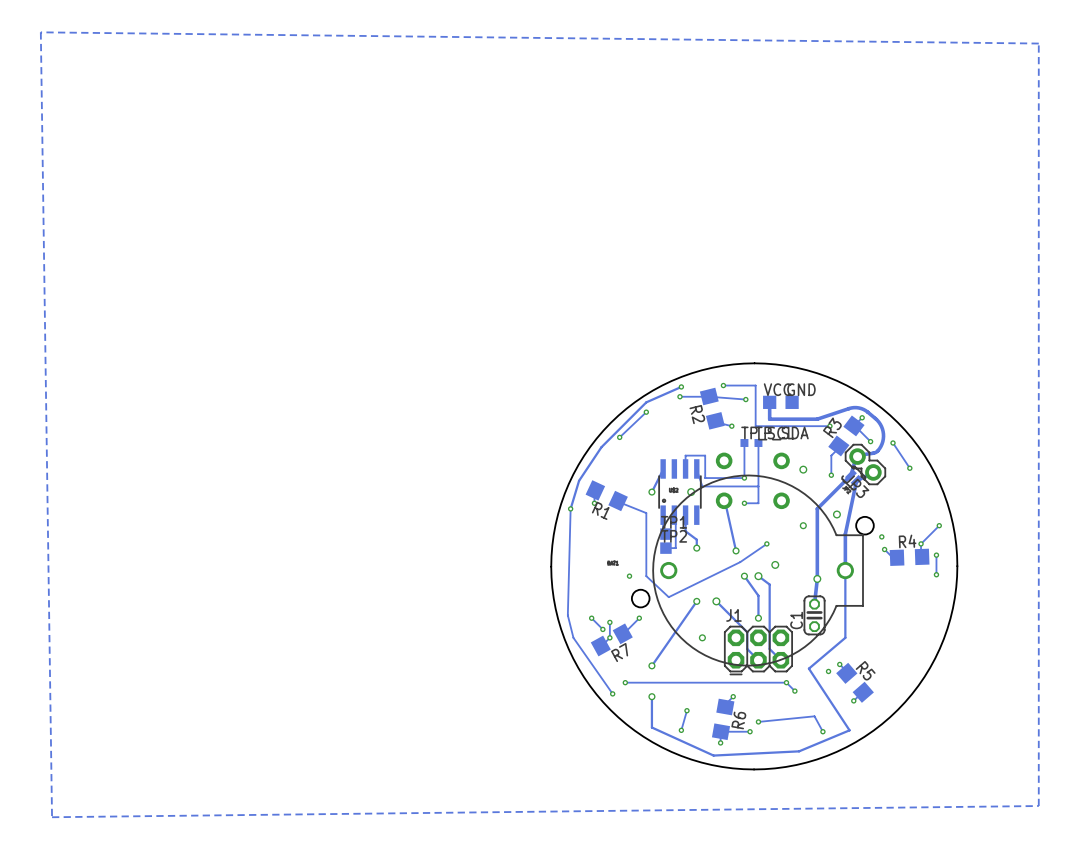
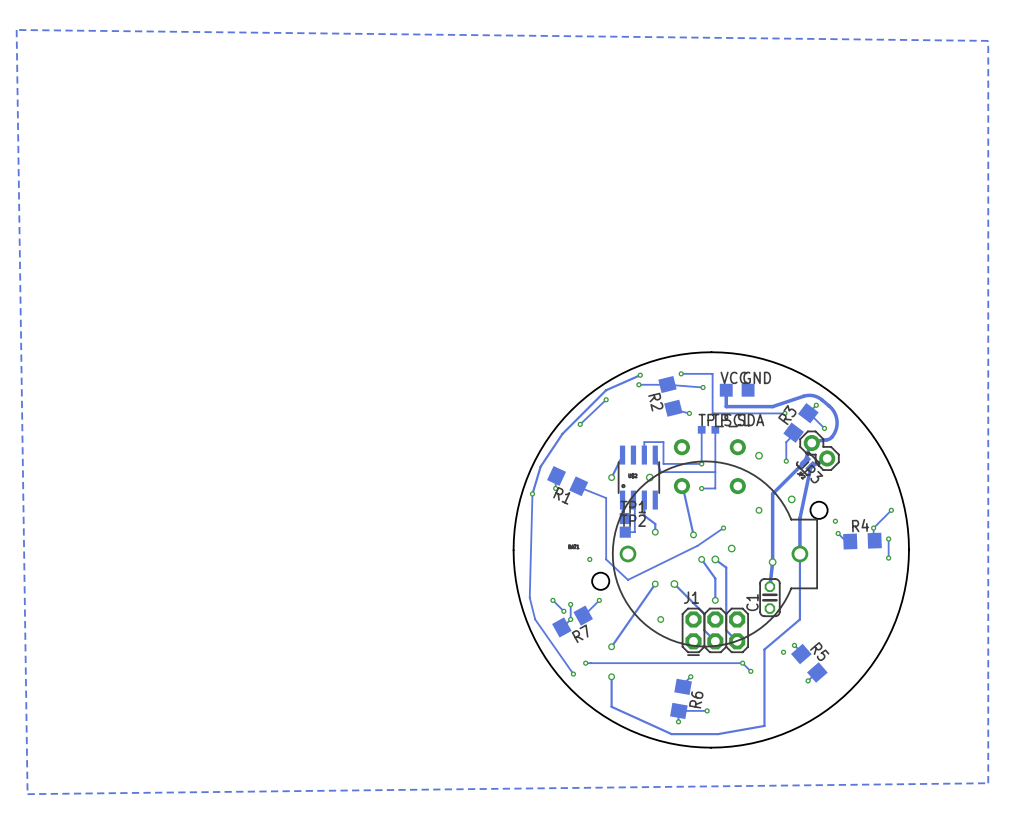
track: (893, 443) (909, 468) -> none
via: (893, 443) -> none
via: (909, 468) -> none
track: (808, 668) (849, 730) (799, 751) (713, 755) -> (764, 649) (764, 725) (718, 734) (671, 734)
track: (686, 710) (681, 730) -> none
via: (686, 710) -> none
track: (758, 721) (814, 716) (822, 731) -> none
via: (758, 721) -> none
via: (681, 730) -> none
via: (822, 731) -> none

